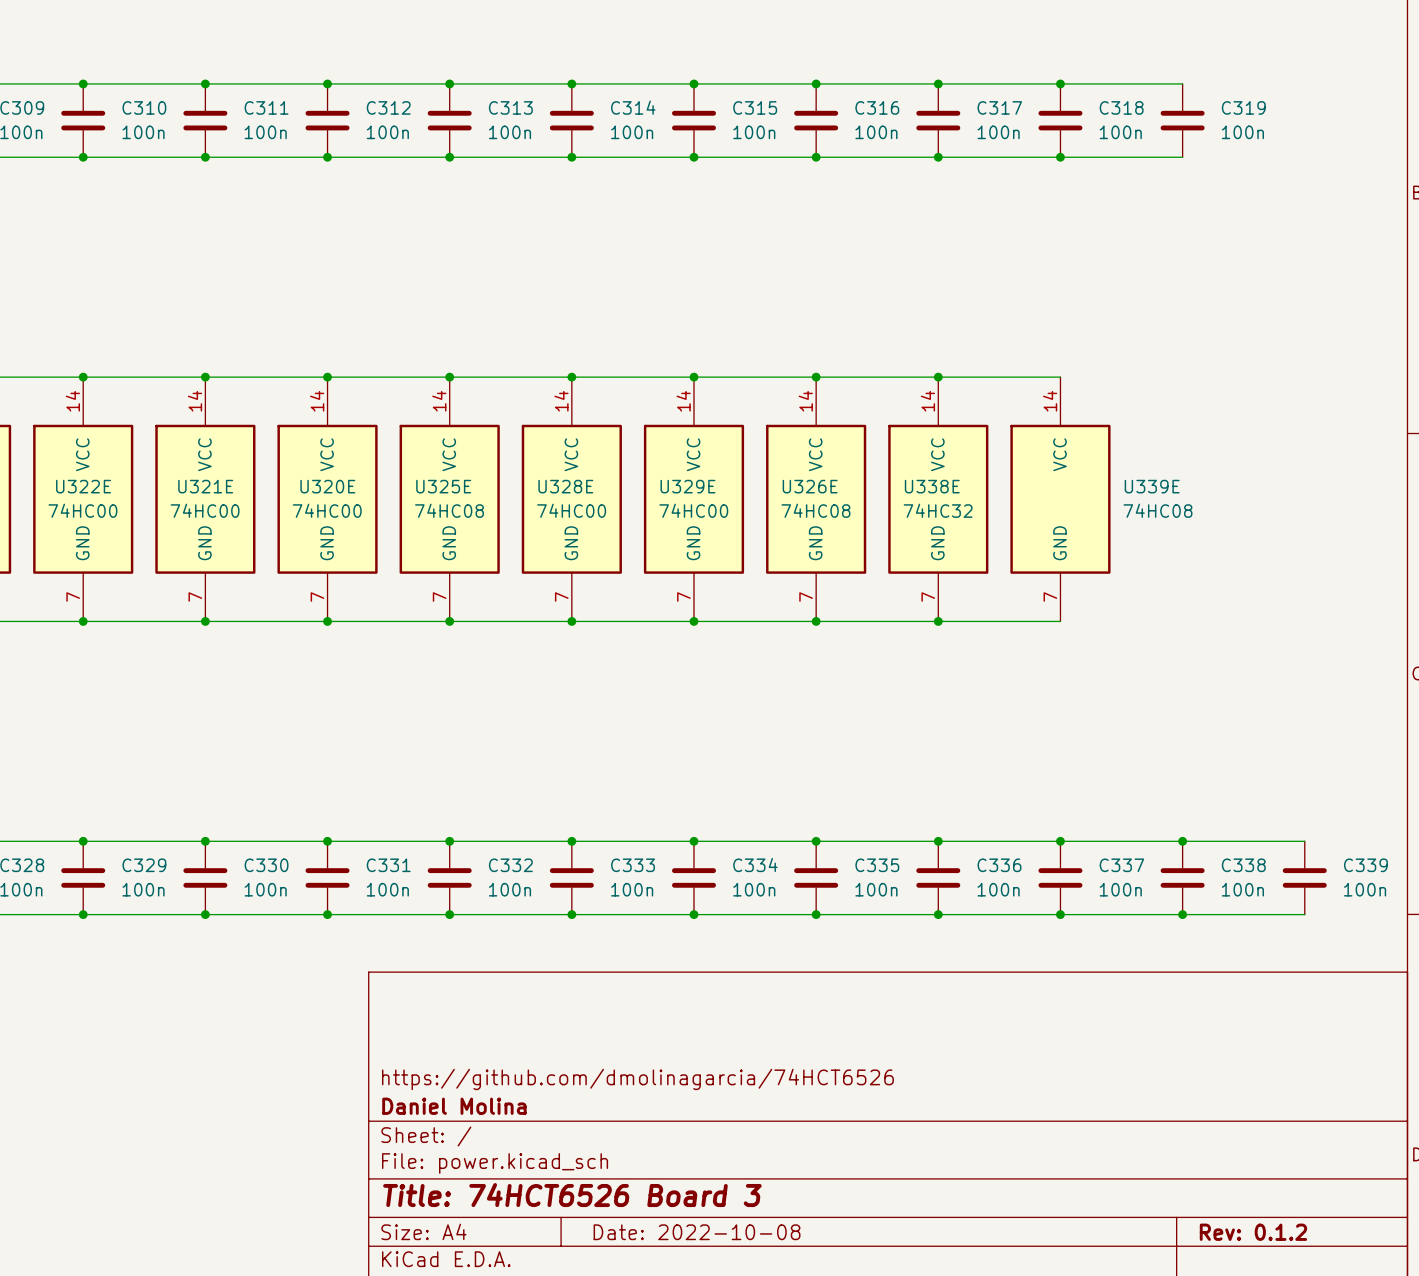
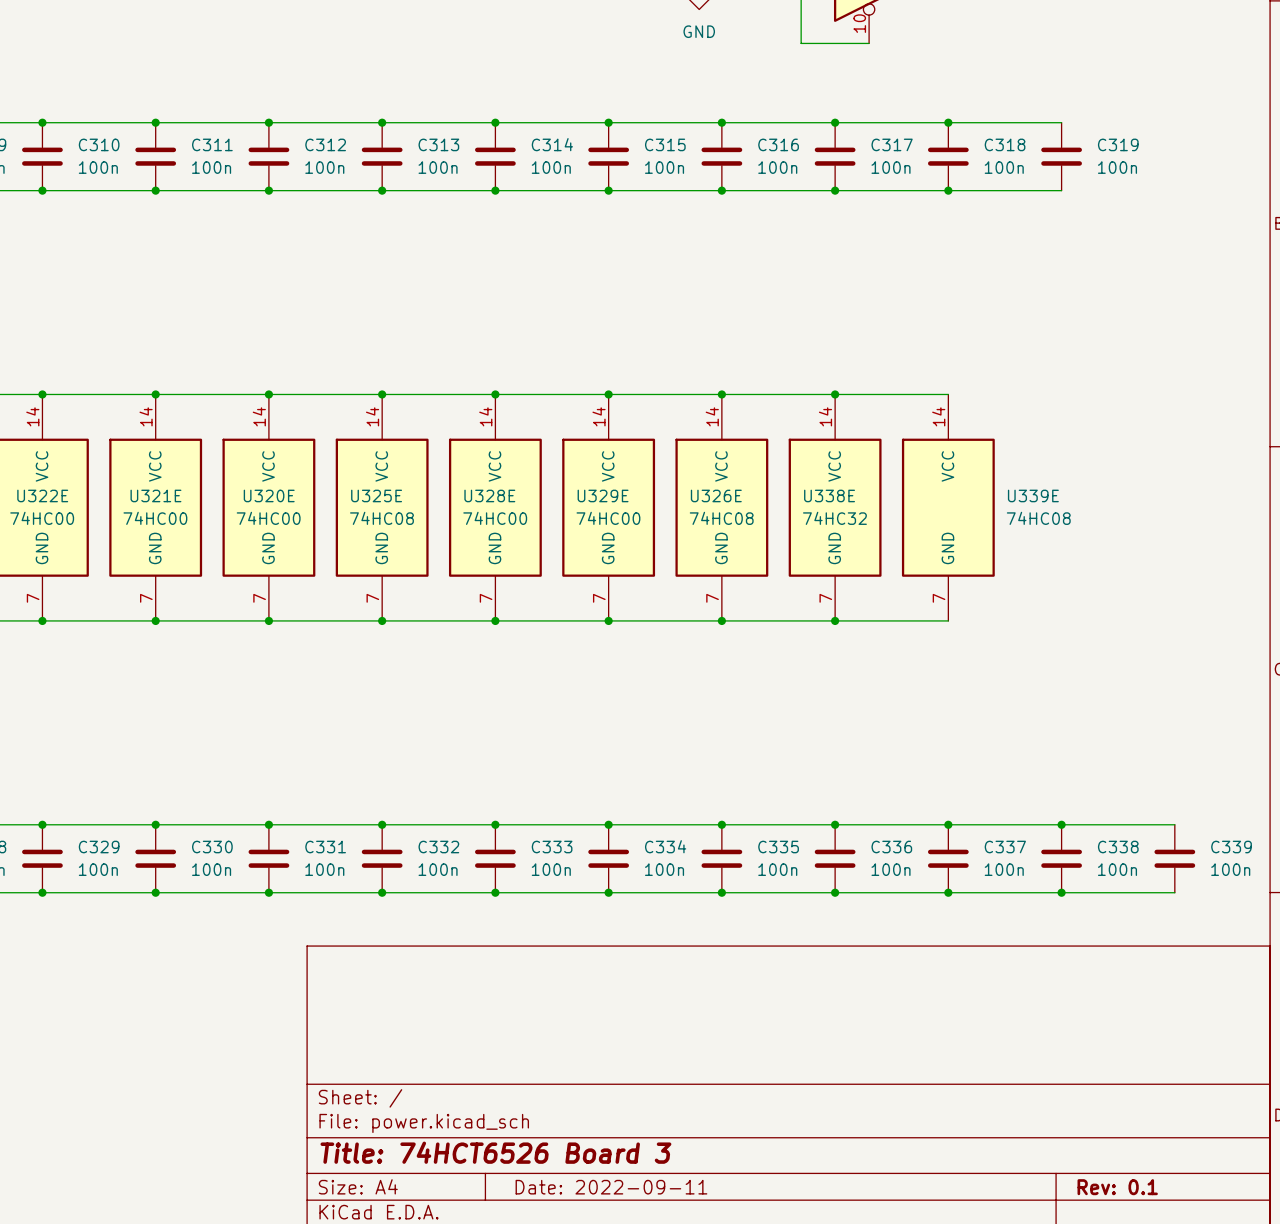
title block: https://github.com/dmolinagarcia/74HCT6526 (637, 1079) -> none
title block: Daniel Molina (454, 1106) -> none
title block: Date: 2022-10-08 (697, 1232) -> Date: 2022-09-11 (611, 1187)
title block: Rev: 0.1.2 (1253, 1232) -> Rev: 0.1 (1117, 1187)

